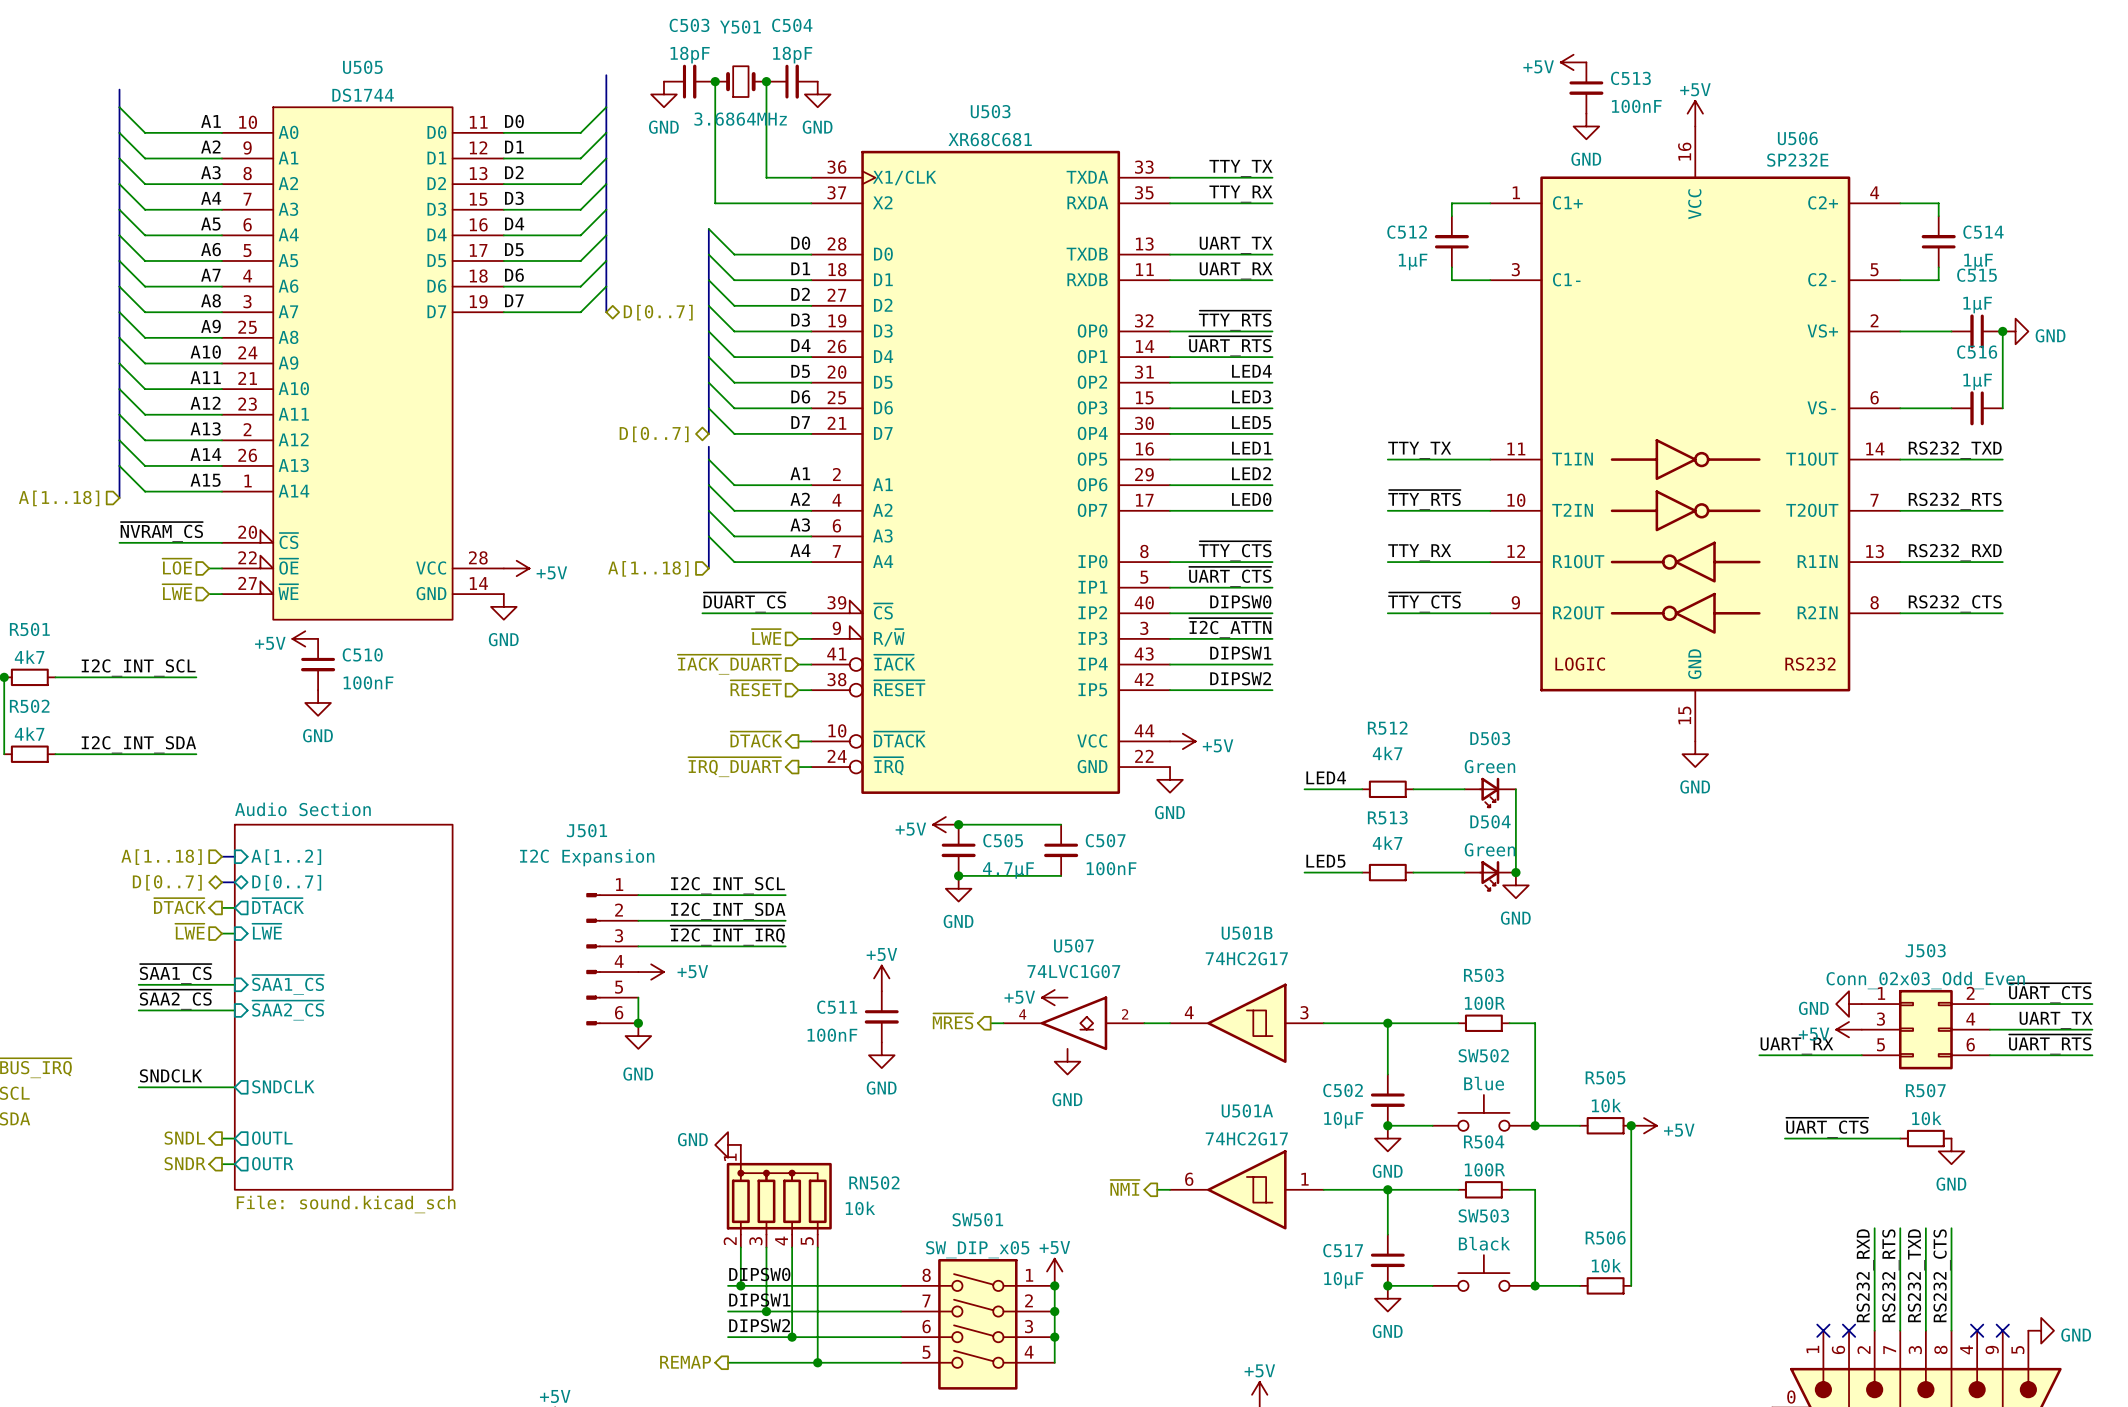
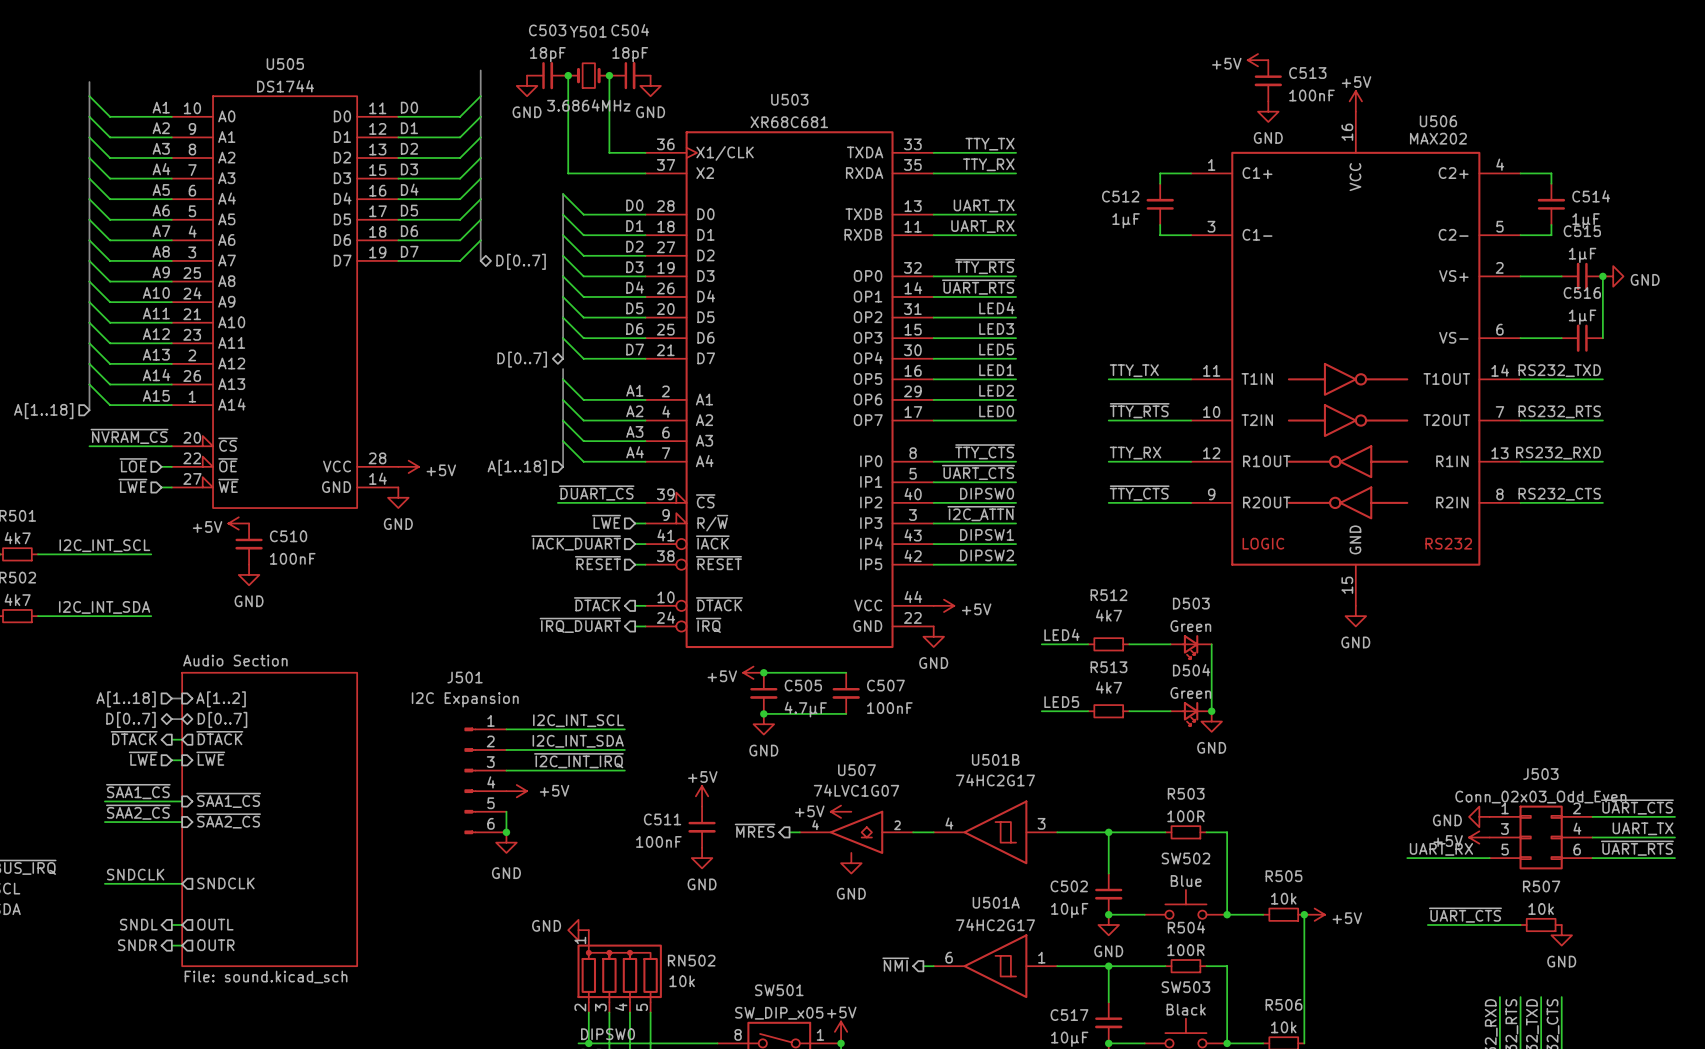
U506 value: SP232E (1797, 160) -> MAX202 (1438, 138)

